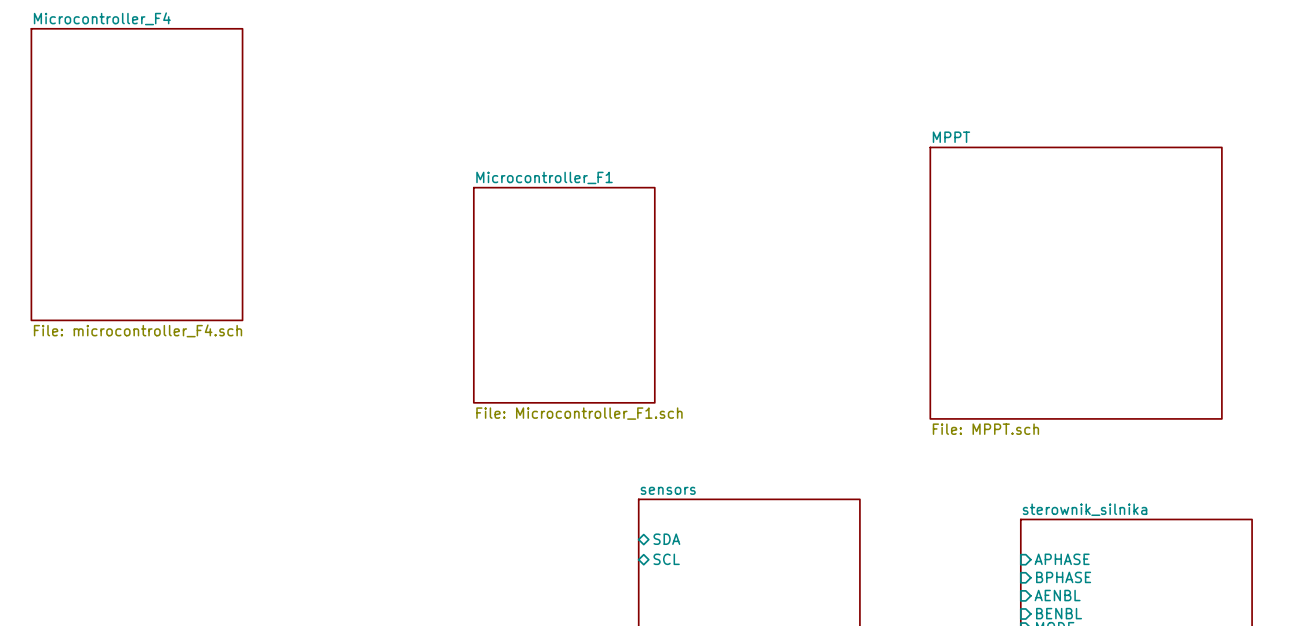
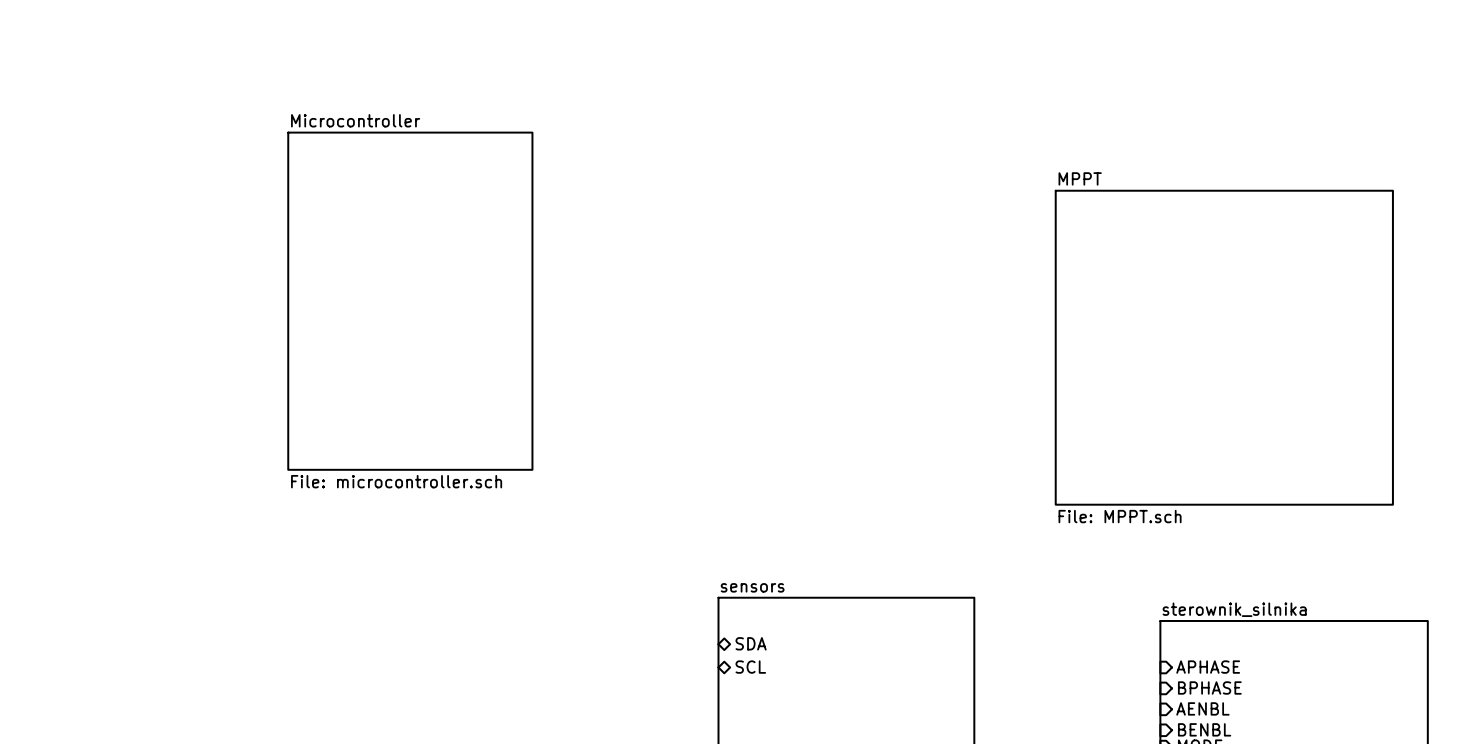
sheet Microcontroller_F4: File: microcontroller_F4.sch (136, 174) -> none
sheet Microcontroller: none -> File: microcontroller.sch (410, 301)
sheet Microcontroller_F1: File: Microcontroller_F1.sch (564, 295) -> none

